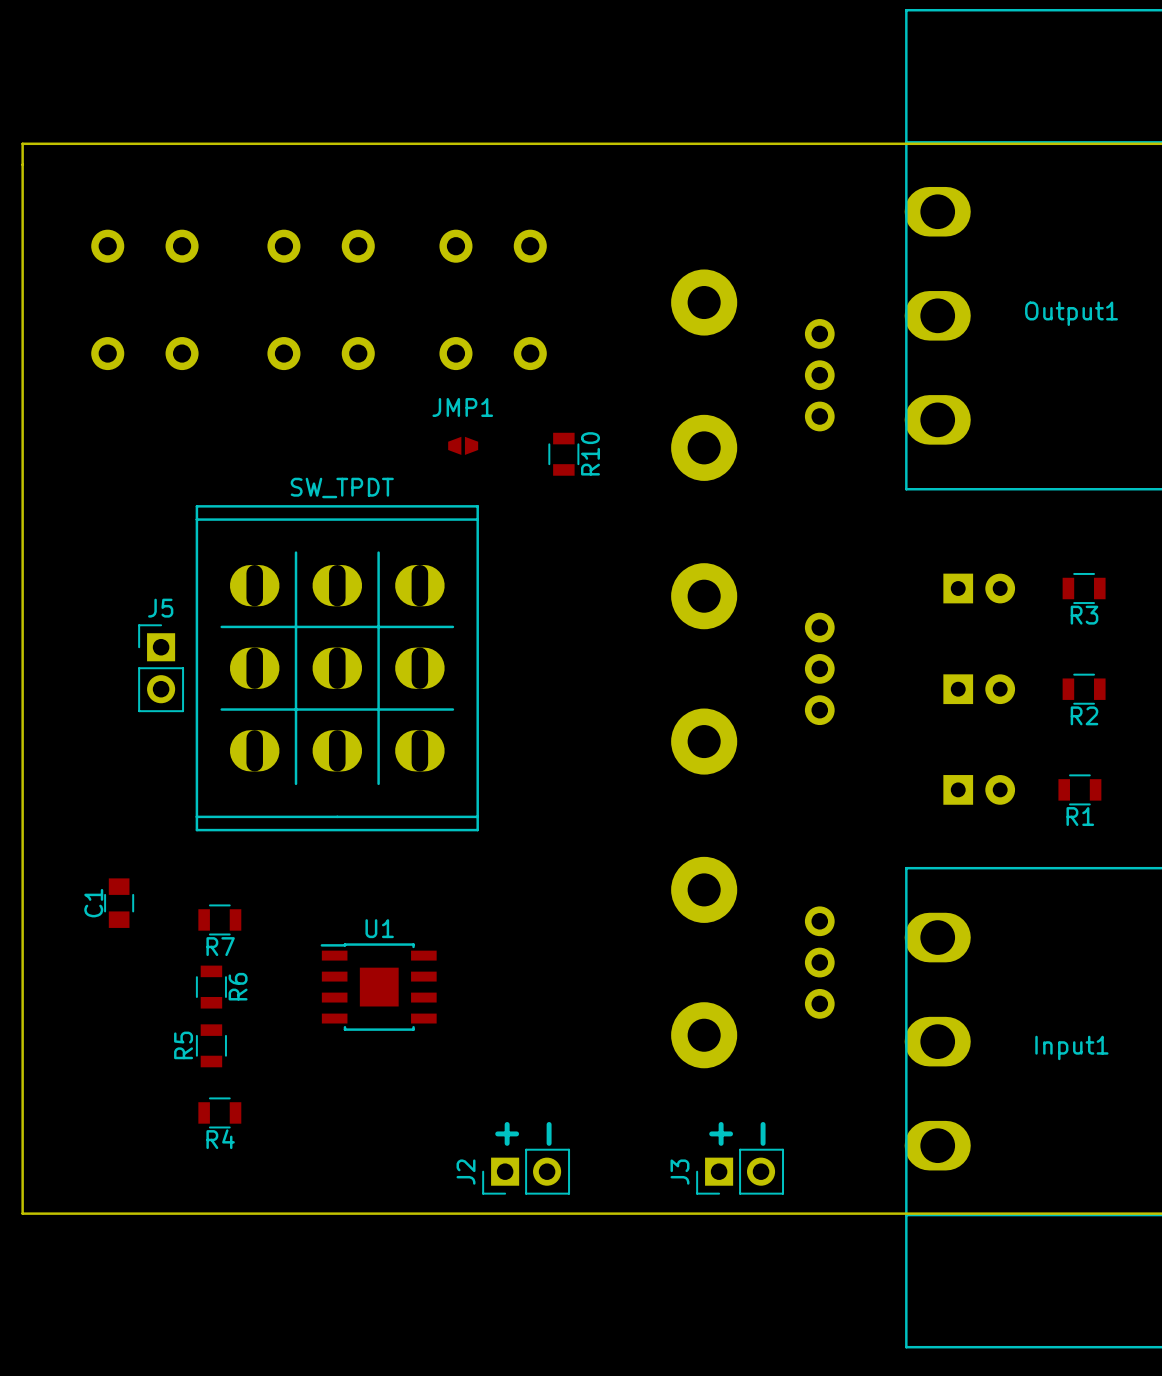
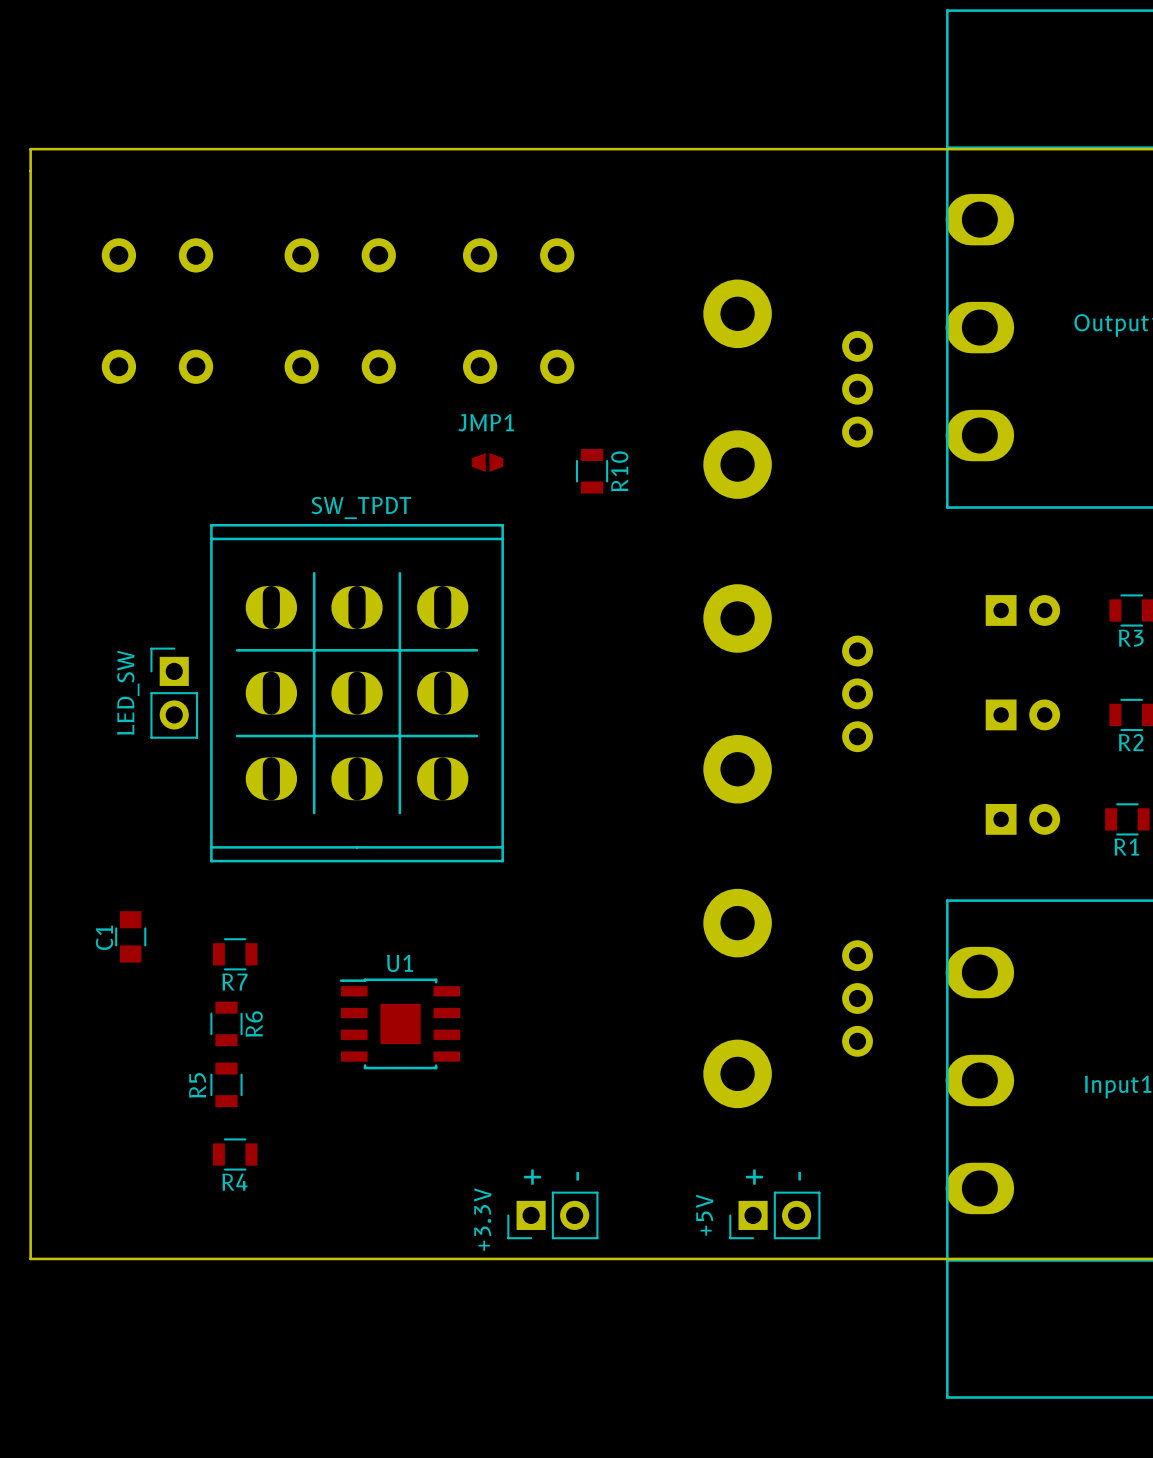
J5 name: J5 (160, 608) -> LED_SW (128, 692)
J2 name: J2 (466, 1172) -> +3.3V (482, 1219)
J3 name: J3 (679, 1172) -> +5V (704, 1215)

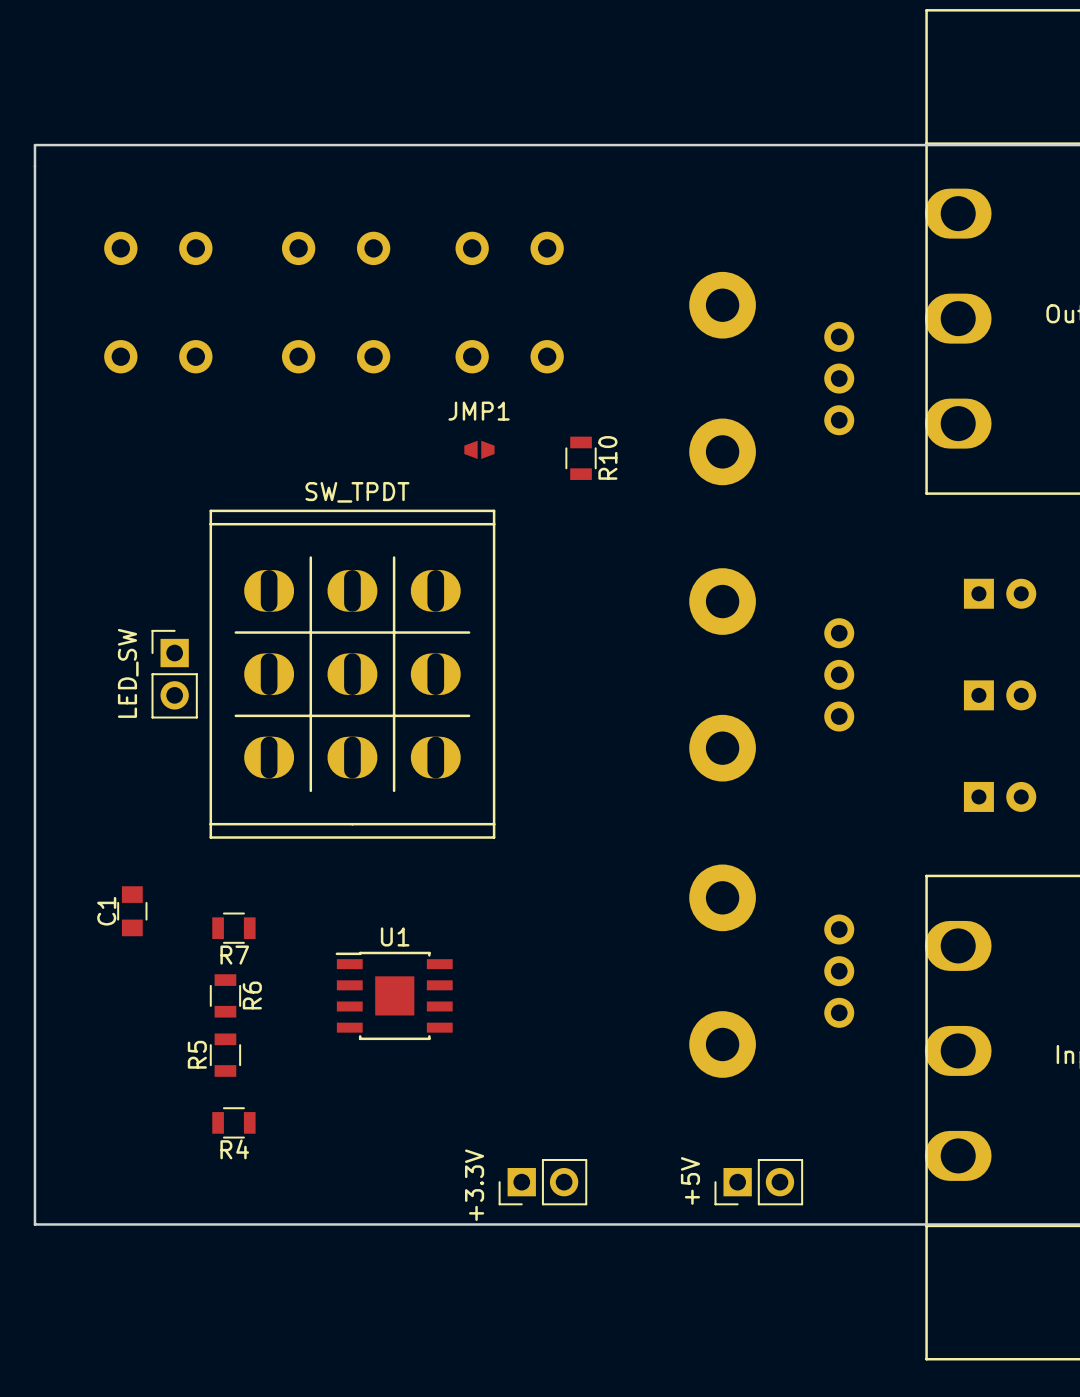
text: - (577, 1176) -> none
text: - (799, 1176) -> none
text: + (532, 1177) -> none
text: + (754, 1177) -> none

